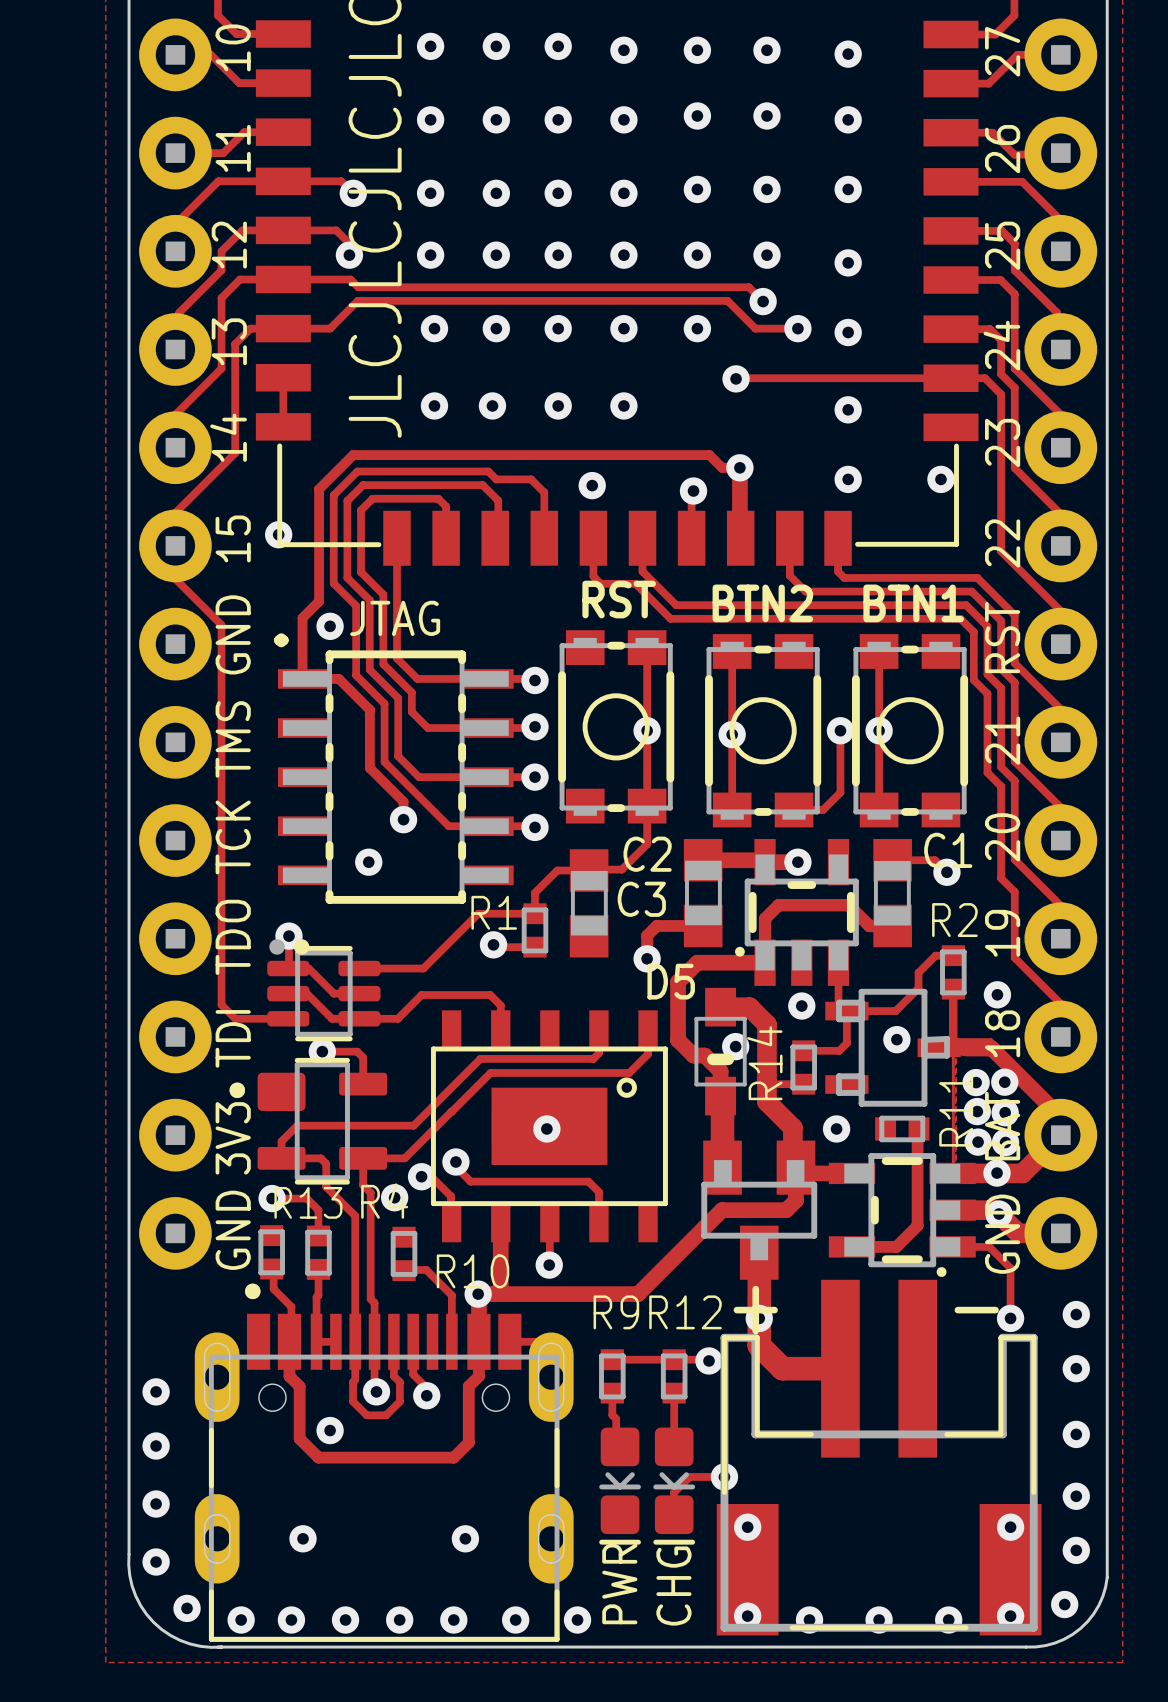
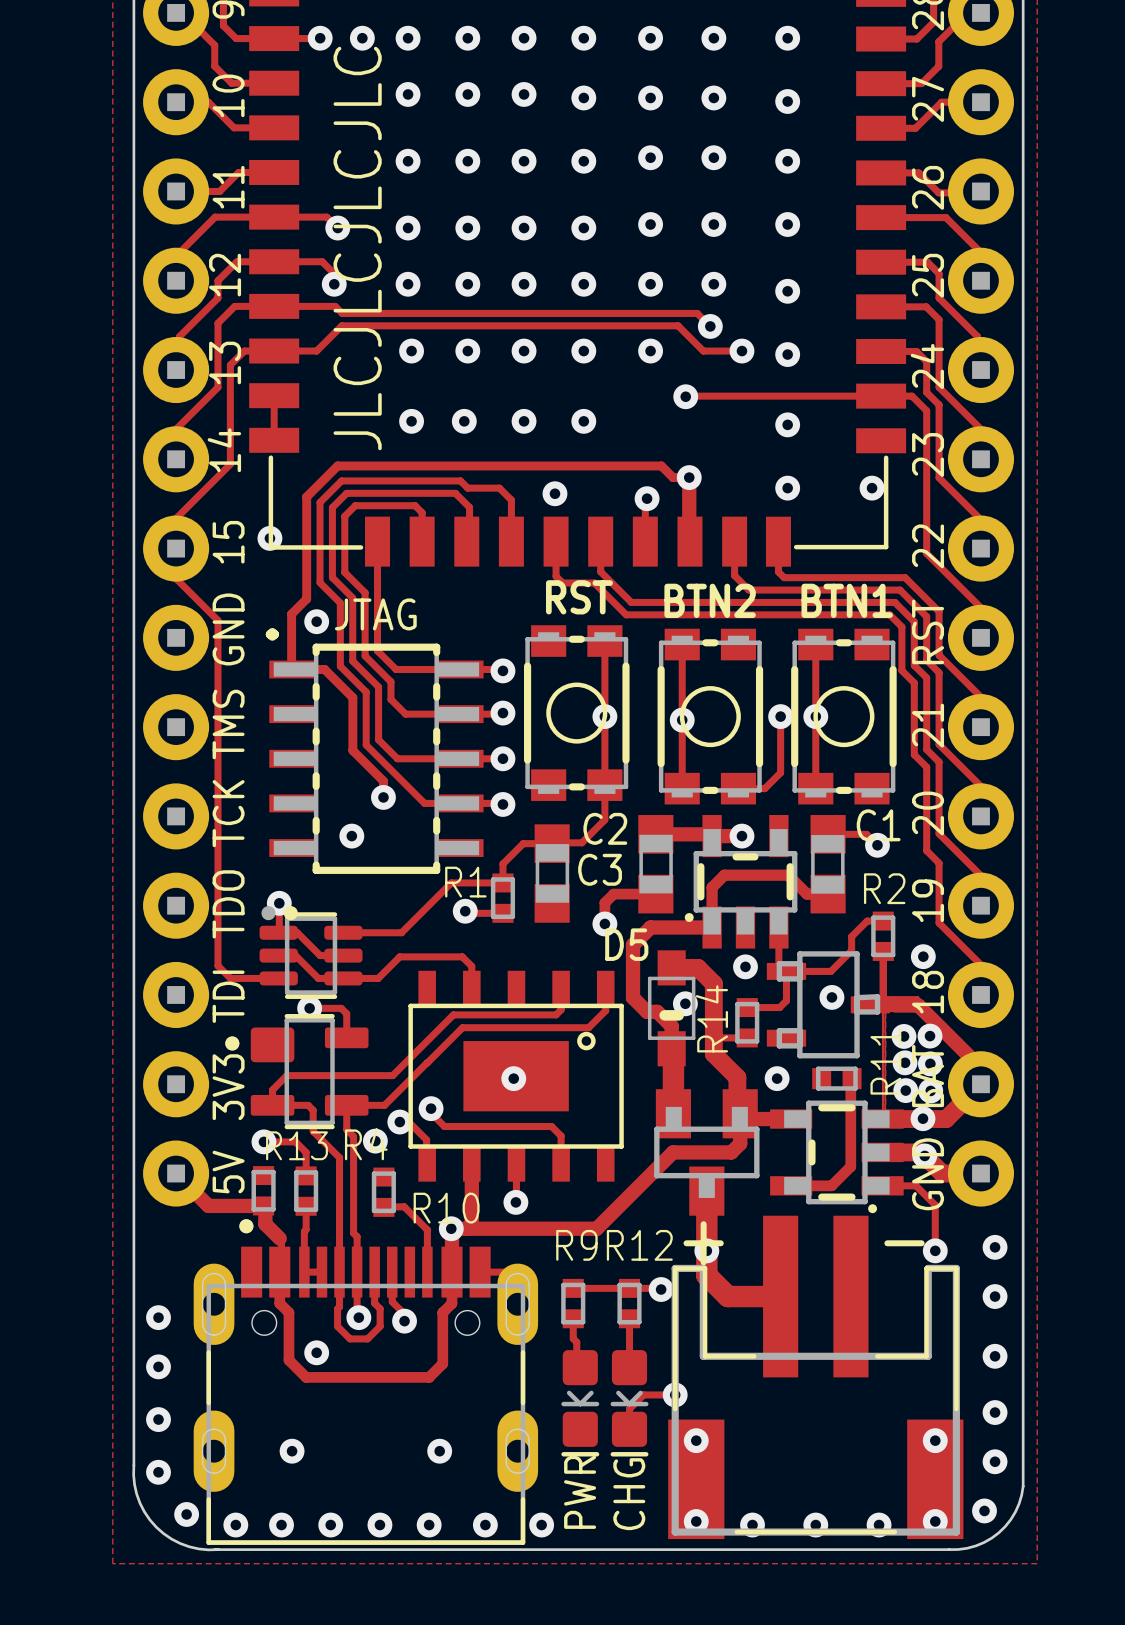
text: GND (233, 1230) -> 5V (228, 1172)
track: none -> (176, 1173) (208, 1205) (263, 1205)
track width: thin (273, 1270) (273, 1289) (289, 1304) -> thick (265, 1207) (265, 1224) (279, 1238)

